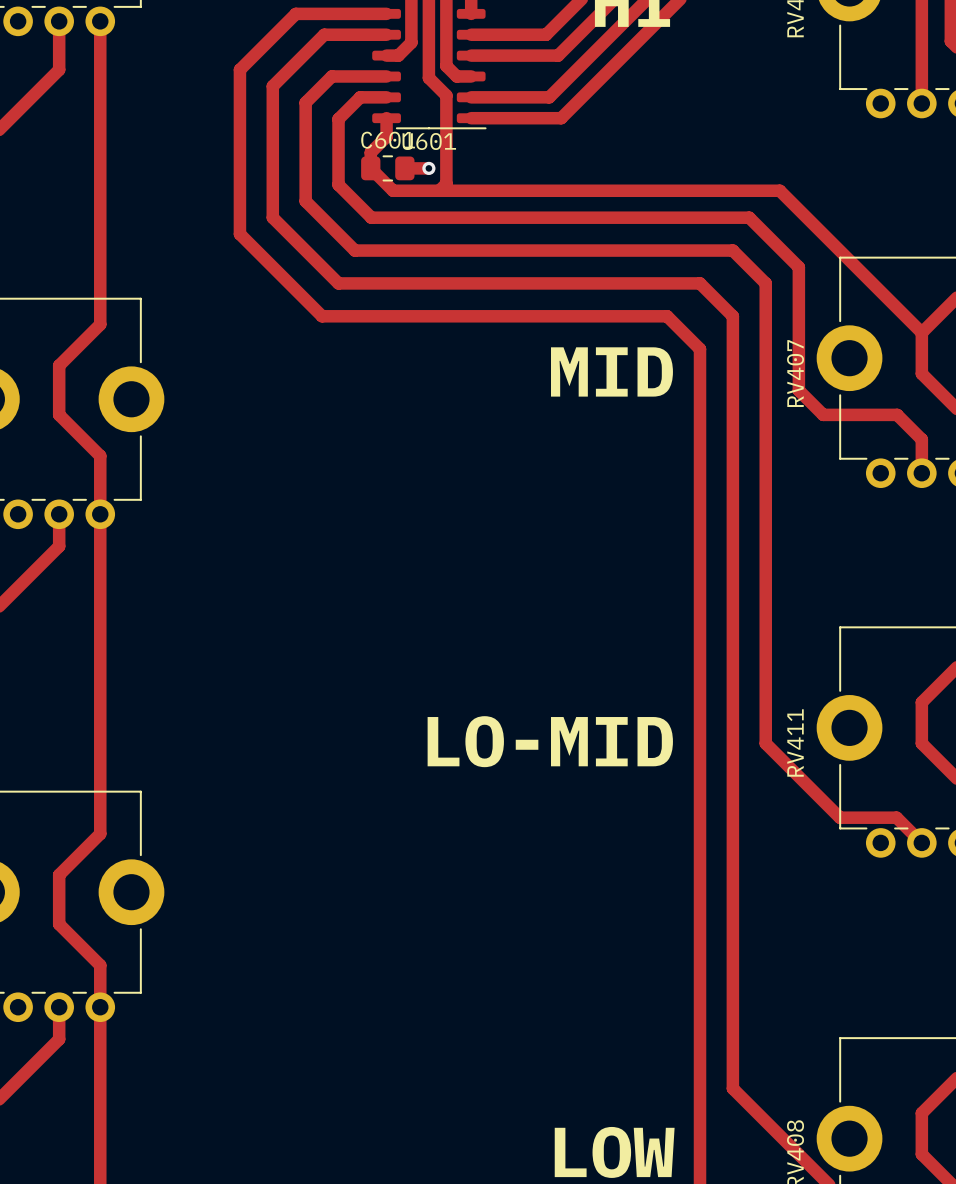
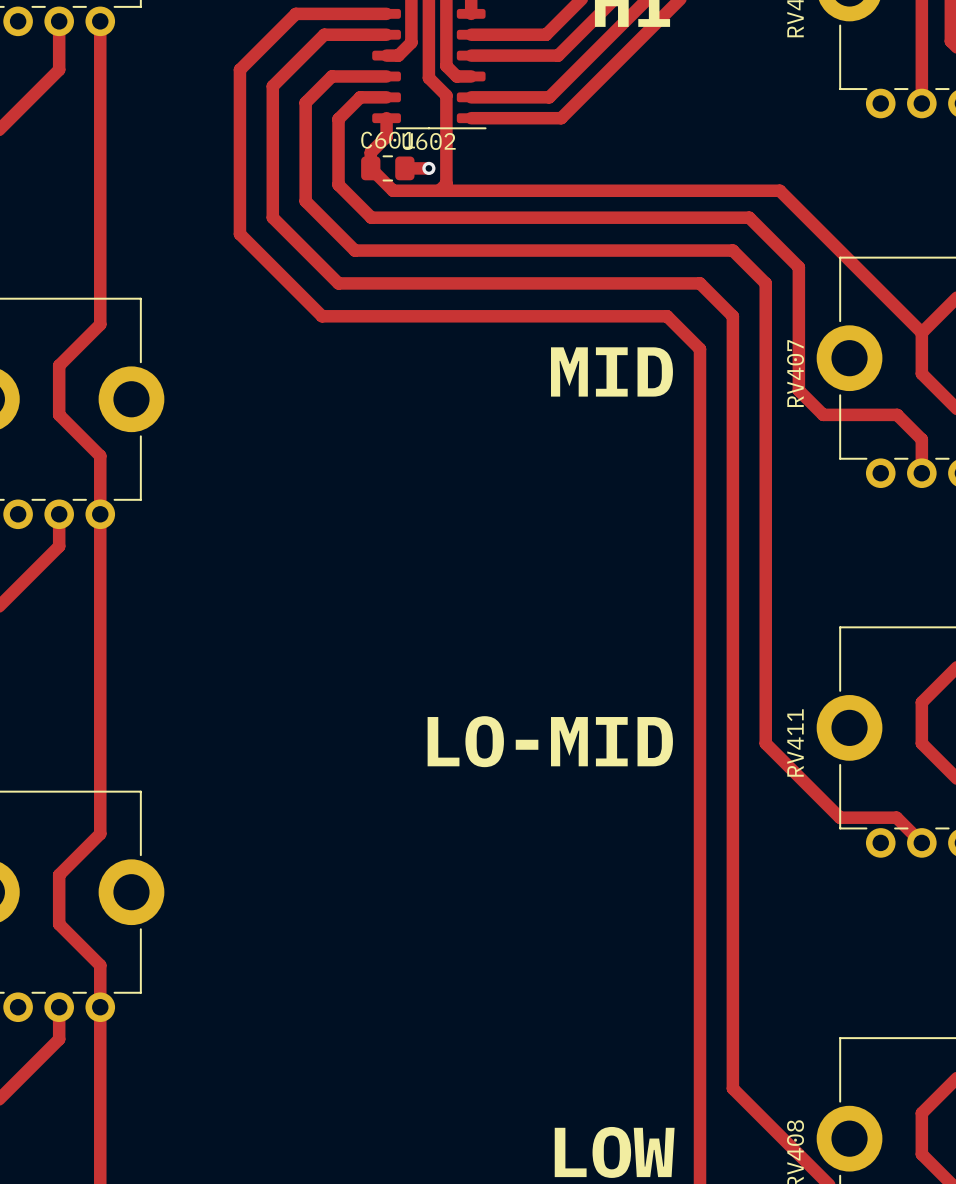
U601 name: U601 (429, 141) -> U602 (429, 141)

